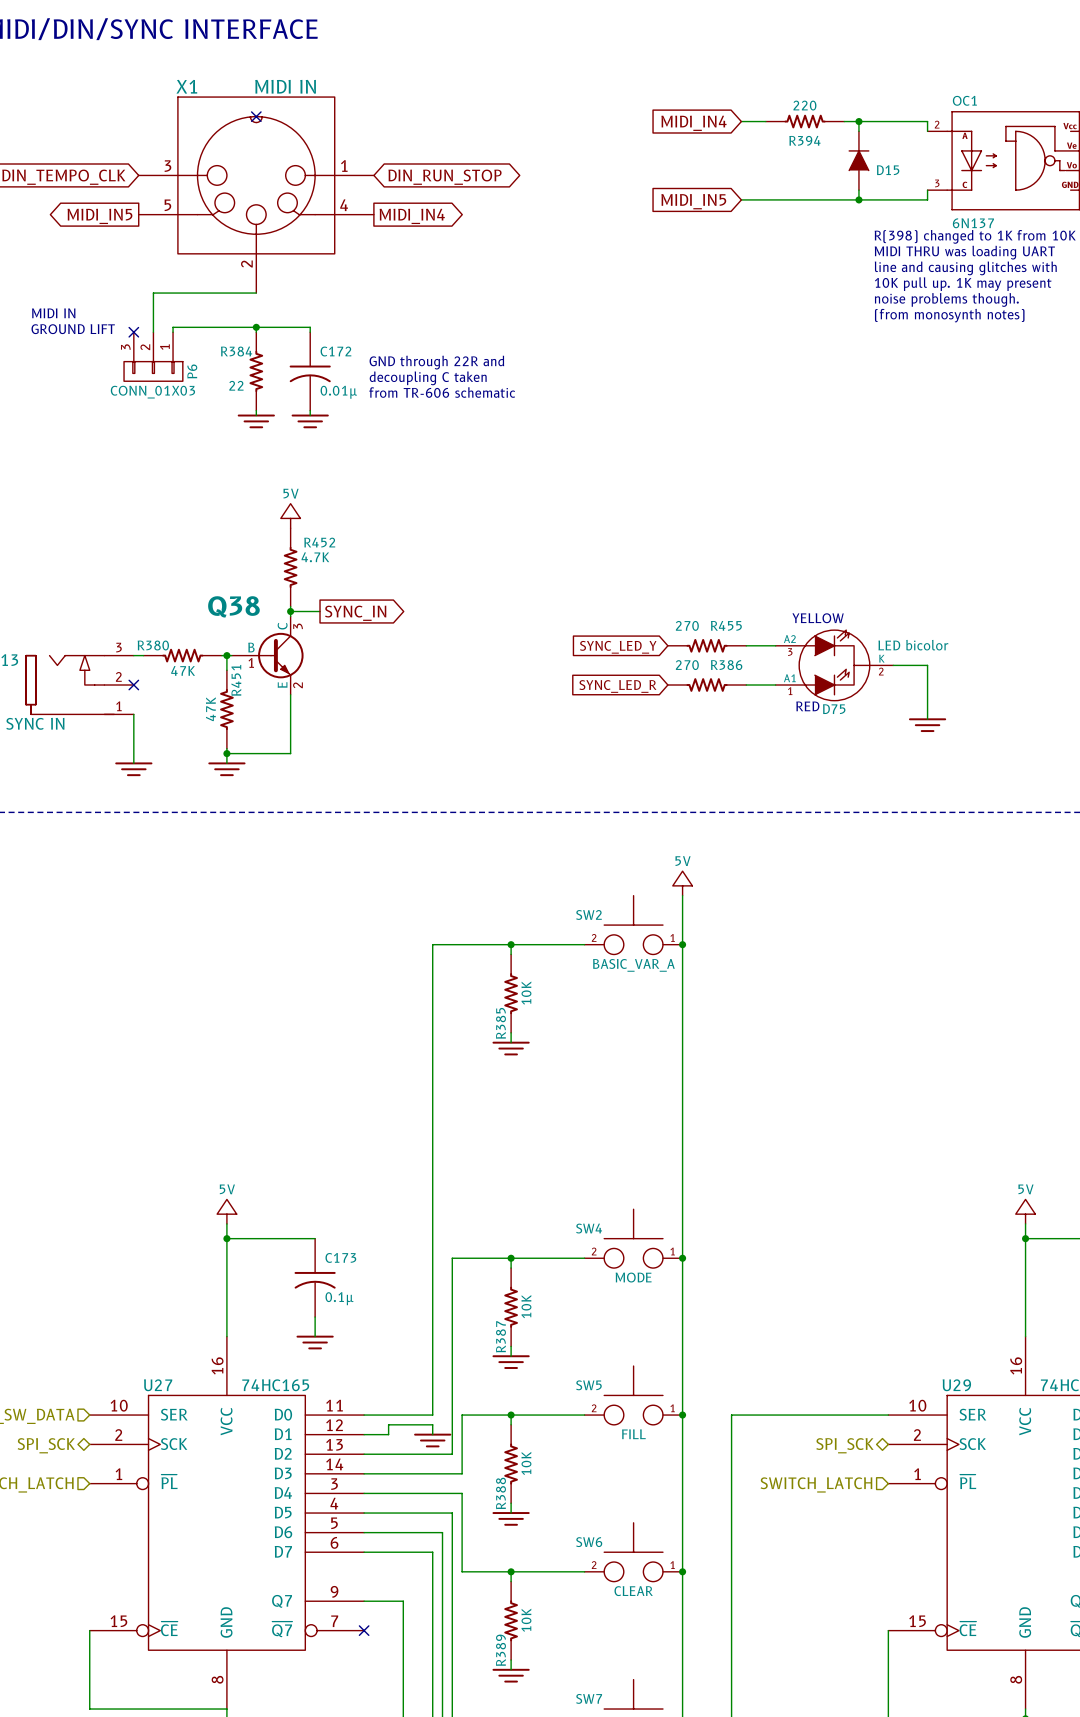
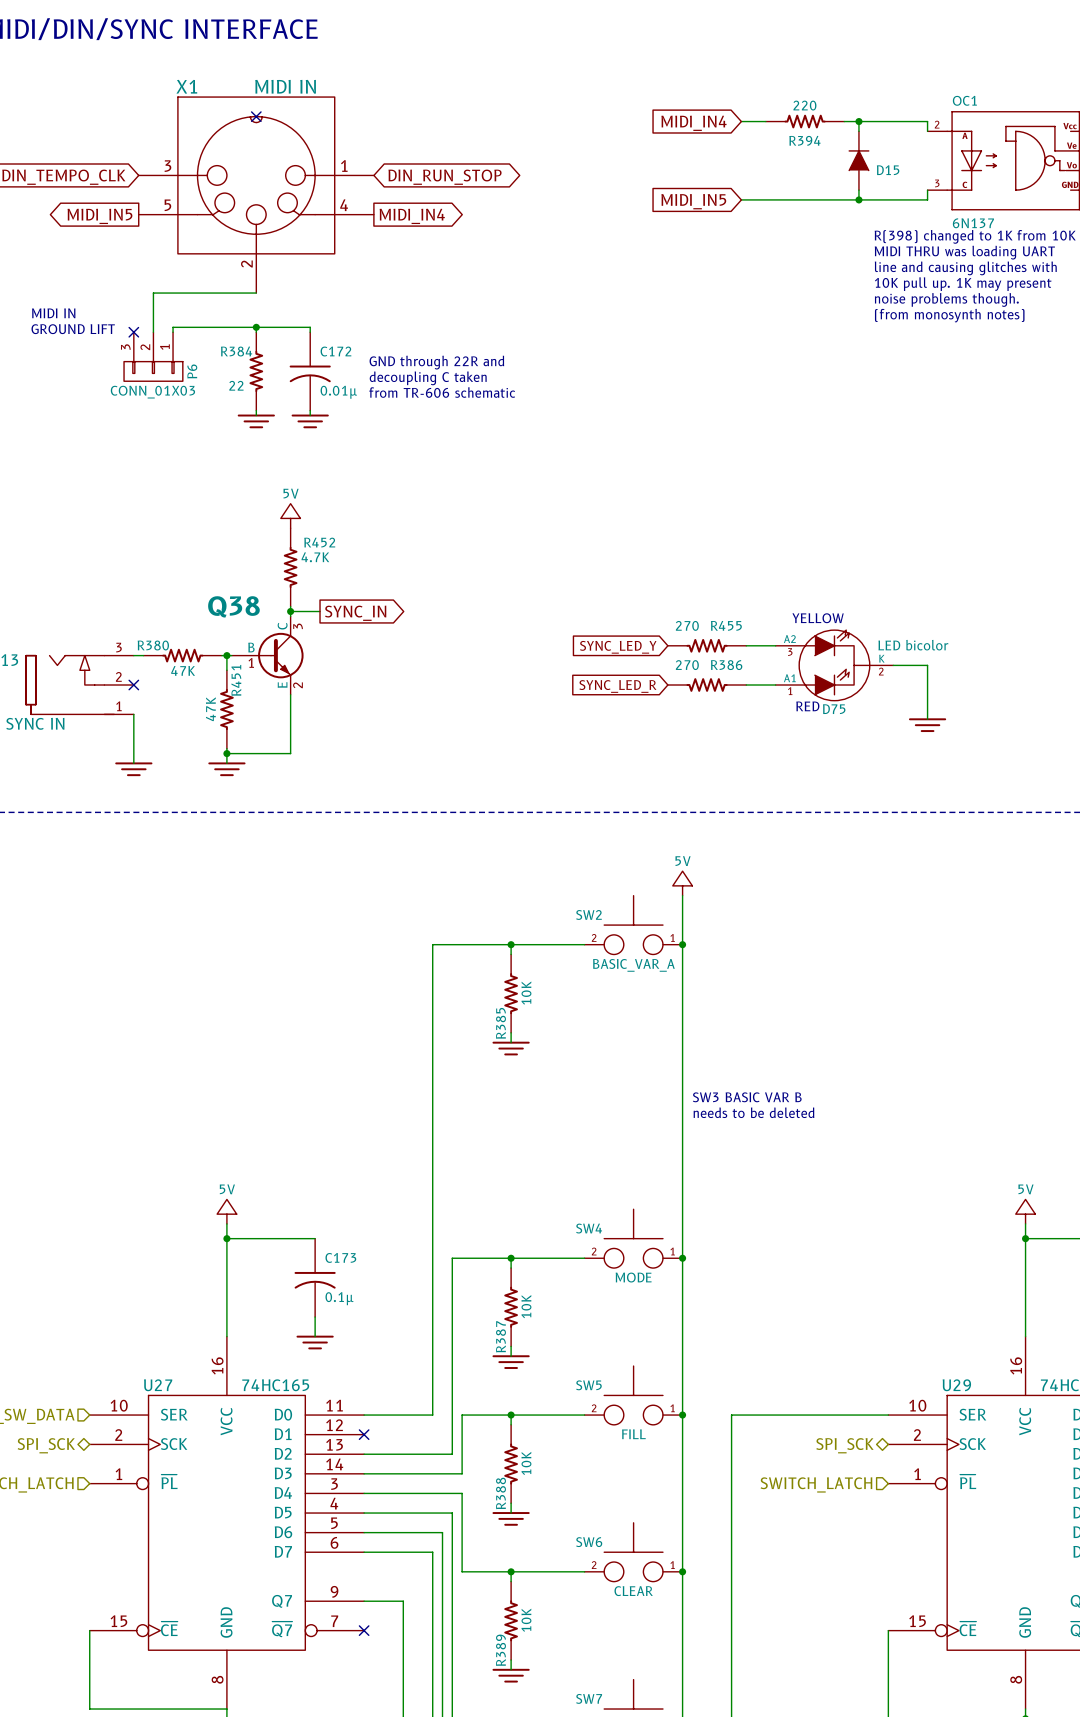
text: none -> SW3 BASIC VAR B (747, 1097)
text: none -> needs to be deleted (754, 1112)
wire: (364, 1434) (388, 1434) (388, 1424) (432, 1424) (432, 1434) -> none
no-connect mark: none -> (364, 1434)
power symbol: (432, 1440) -> none

